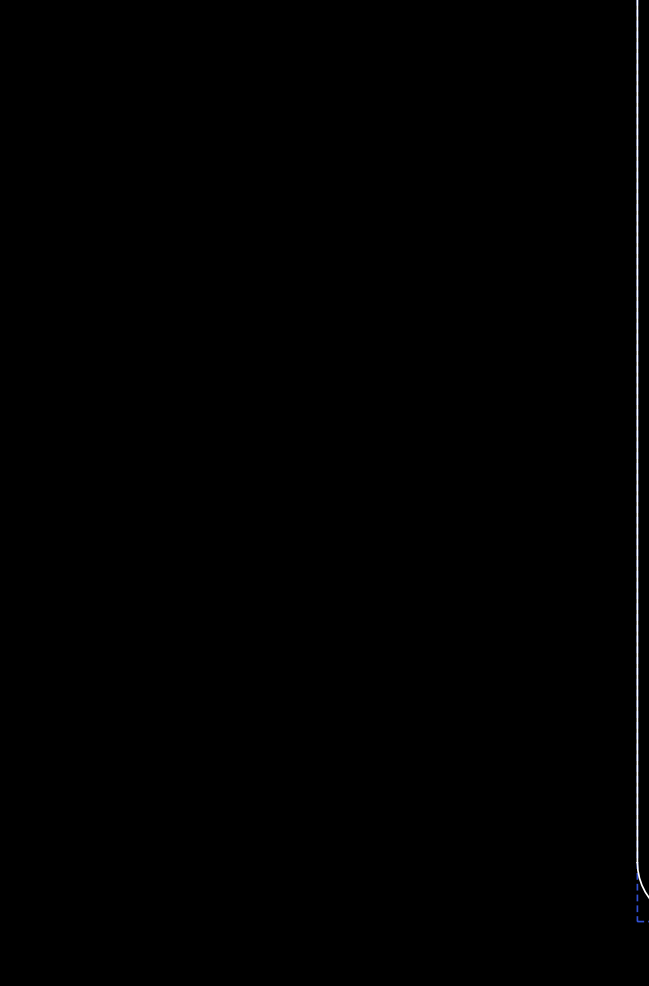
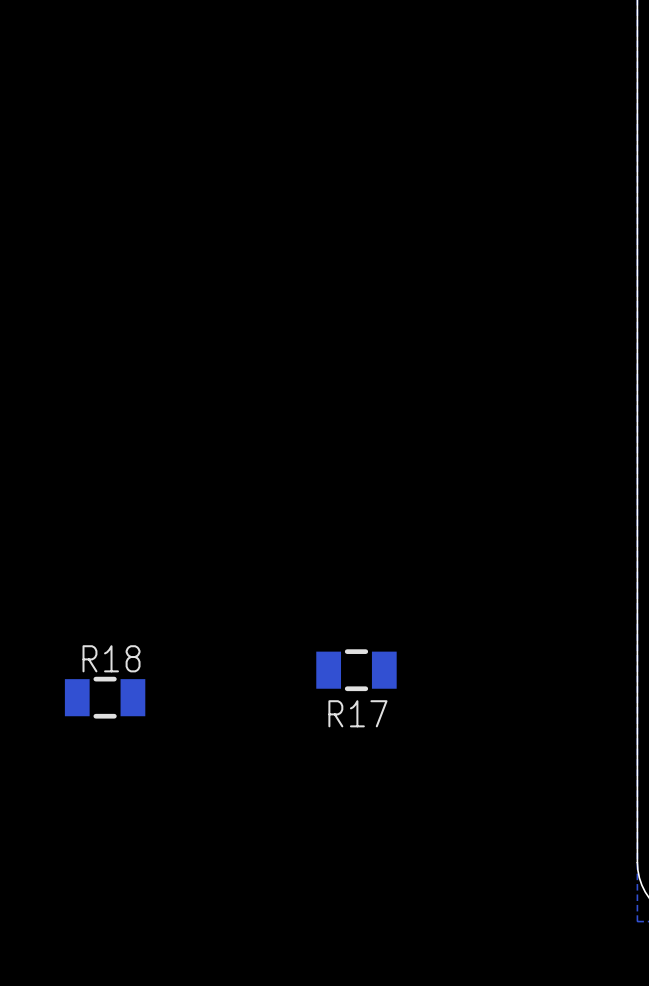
R17: none -> (356, 670)
R18: none -> (105, 697)

